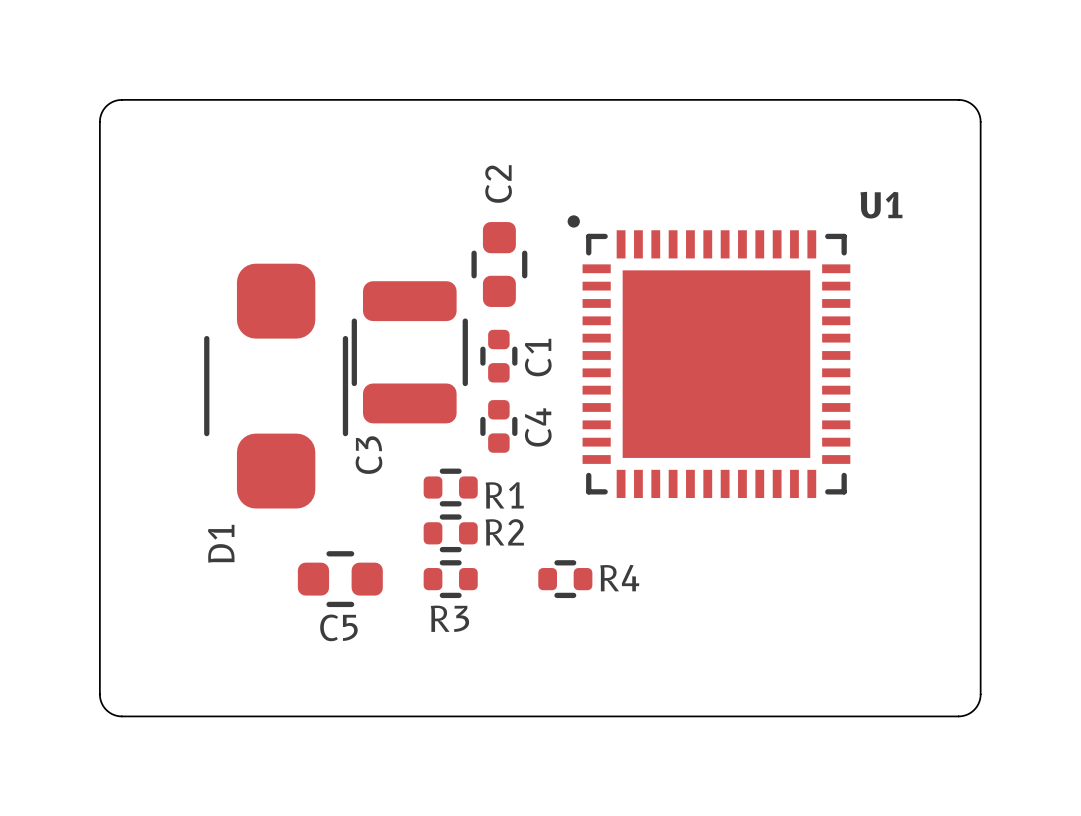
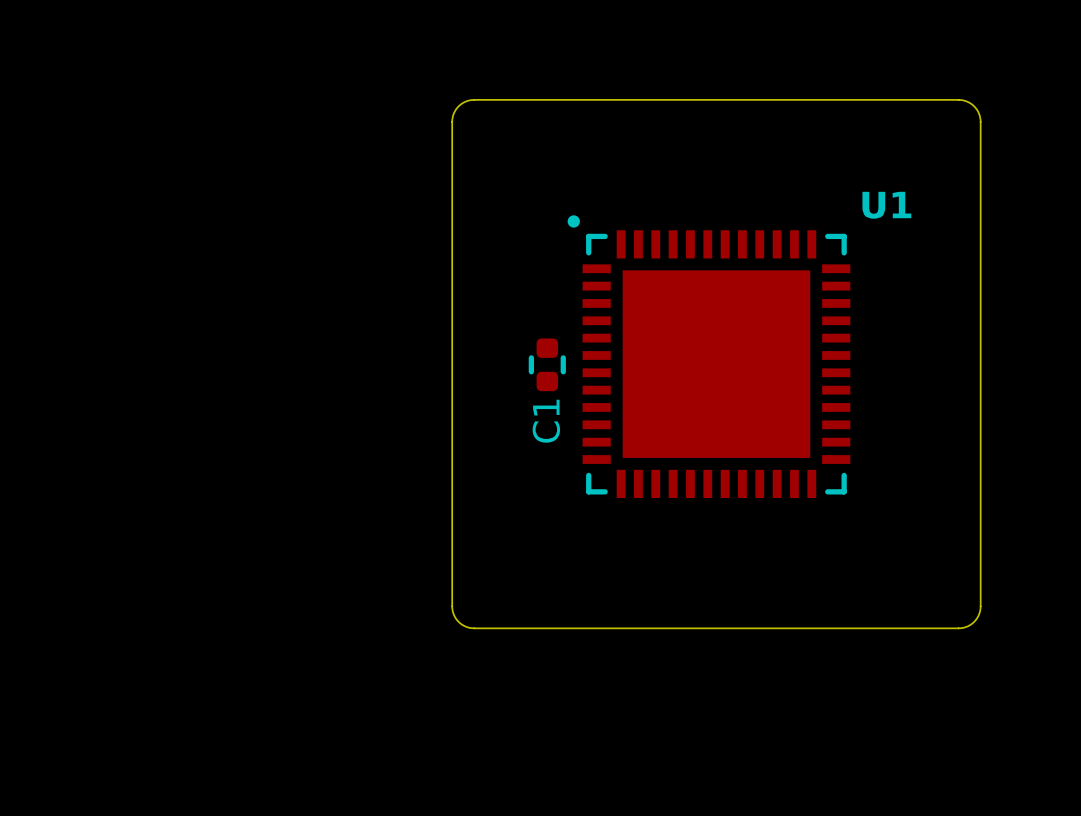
board edge: (474, 99) (121, 99) (112, 102) (103, 110) (99, 121) (99, 694) (102, 703) (106, 709) (114, 715) (121, 716) (961, 716) (972, 711) (980, 699) (980, 606) -> (474, 99) (466, 101) (458, 106) (453, 114) (452, 121) (452, 606) (453, 613) (458, 621) (466, 627) (474, 628) (958, 628) (965, 627) (974, 621) (979, 613) (980, 606)
C2: (499, 264) -> none
C3: (409, 352) -> none
C1 position: (498, 356) -> (547, 364)
C1 name position: C1 (538, 357) -> C1 (546, 421)
D1: (276, 386) -> none
C4: (498, 426) -> none
R1: (450, 487) -> none
R2: (450, 533) -> none
C5: (340, 579) -> none
R3: (450, 579) -> none
R4: (565, 579) -> none

